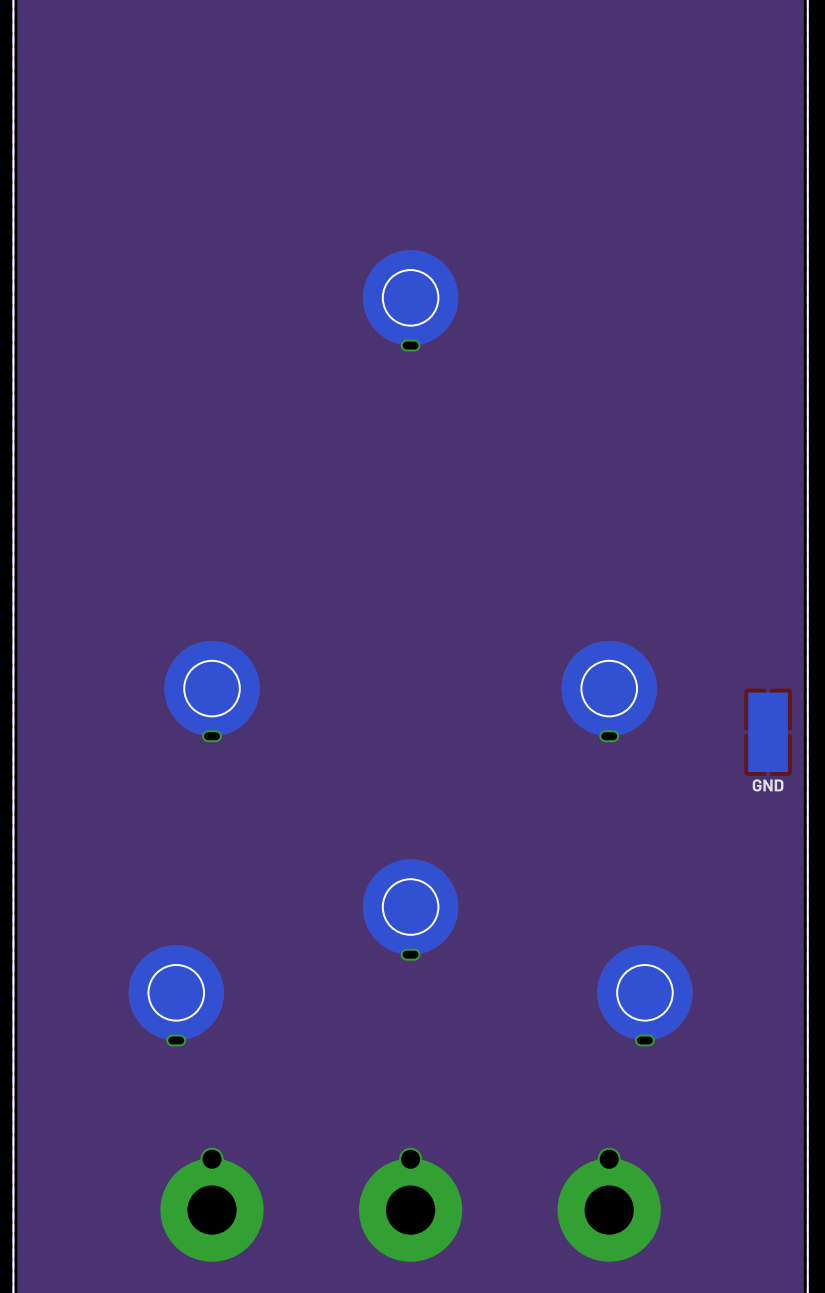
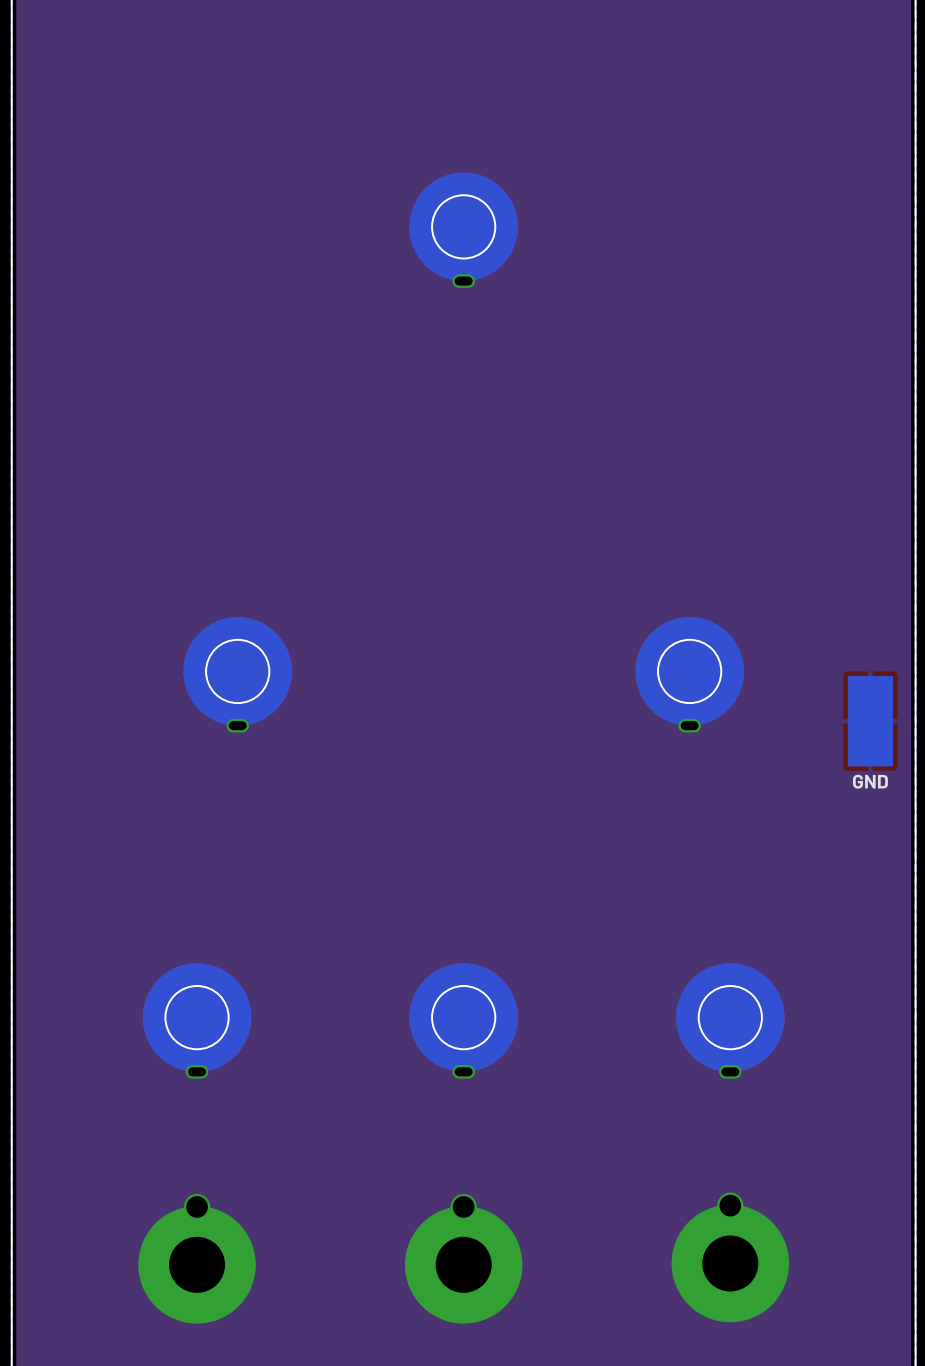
part position: (410, 910) -> (463, 1021)
part position: (212, 1204) -> (197, 1258)
part position: (609, 1204) -> (730, 1257)

